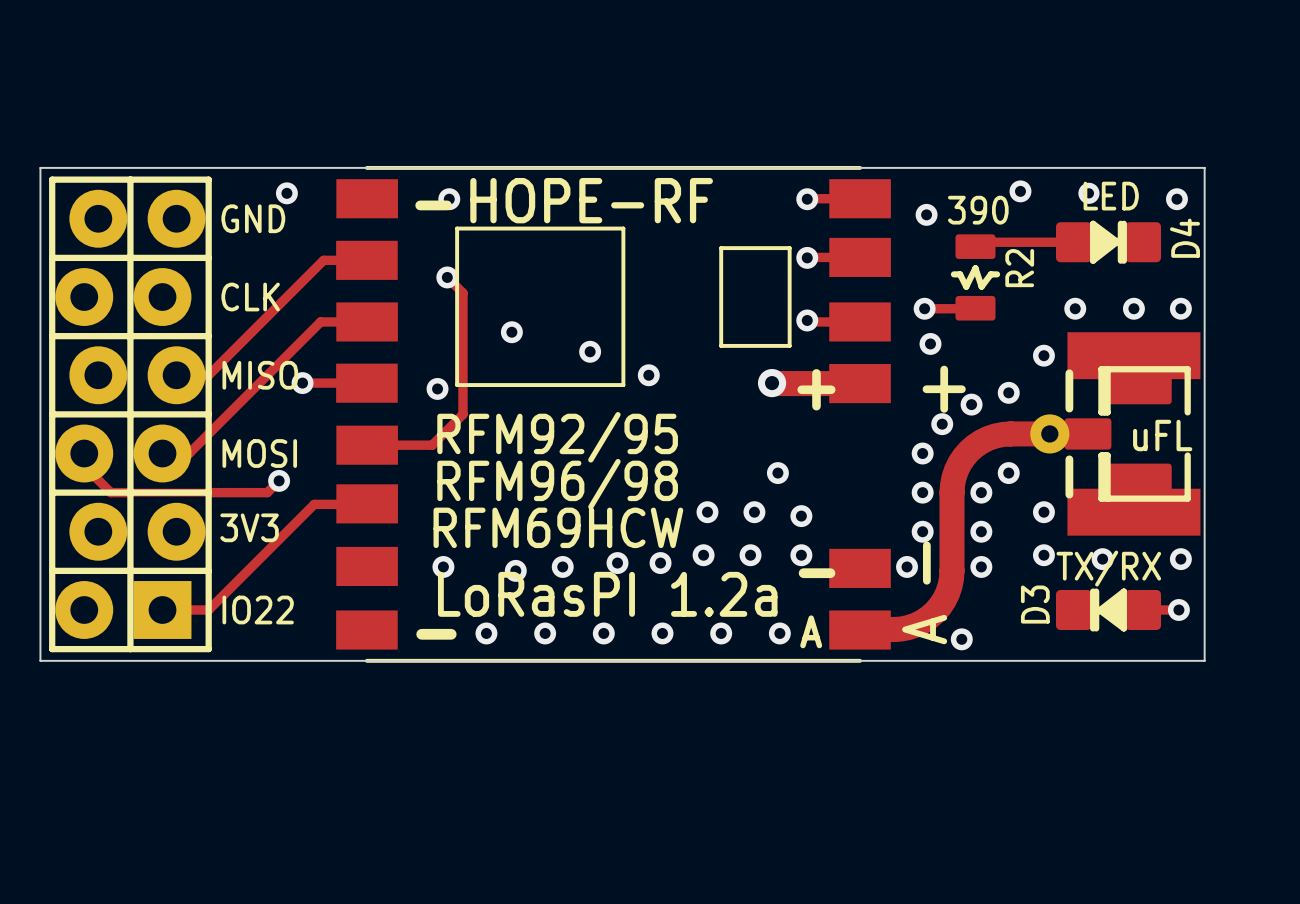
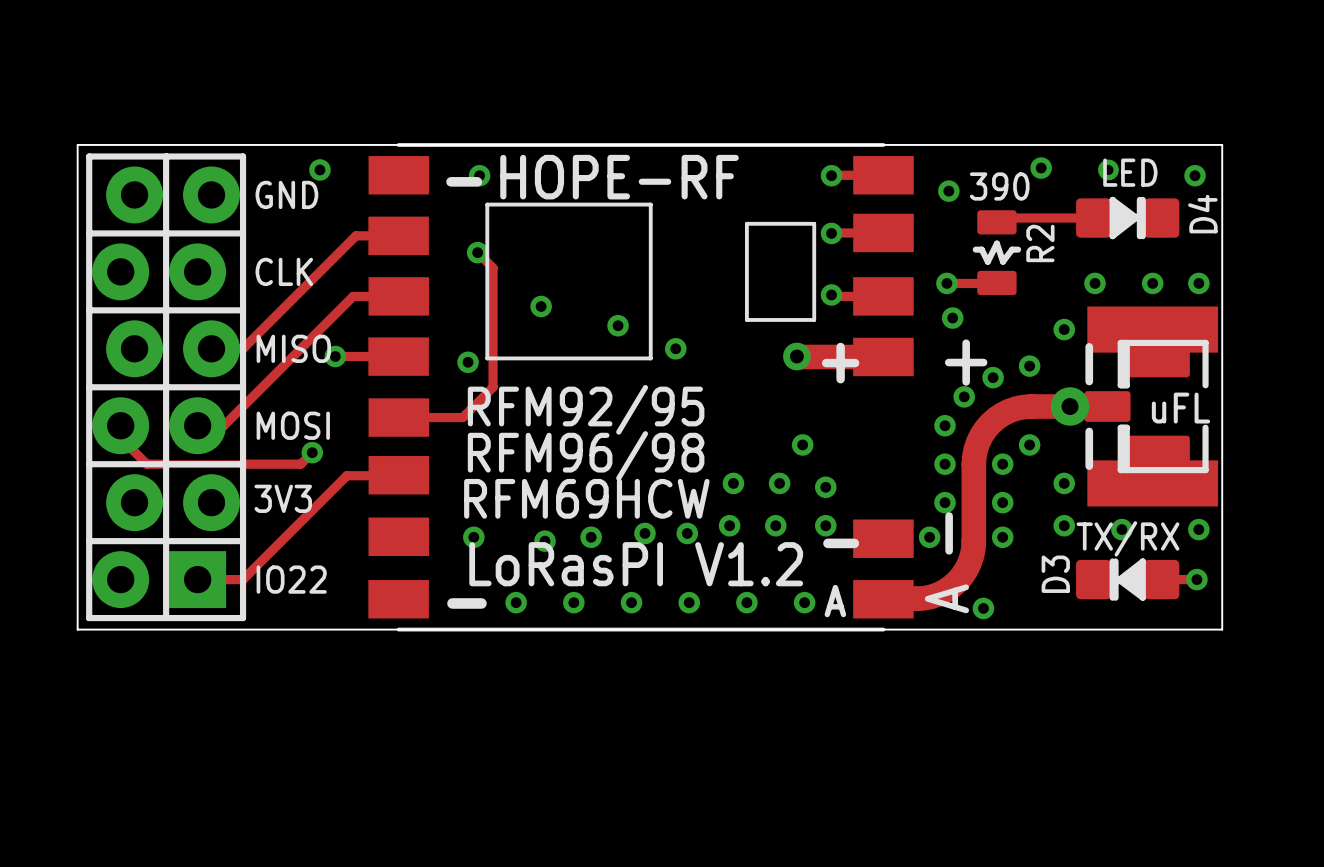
text: LoRasPI 1.2a (607, 594) -> LoRasPI V1.2 (636, 564)

